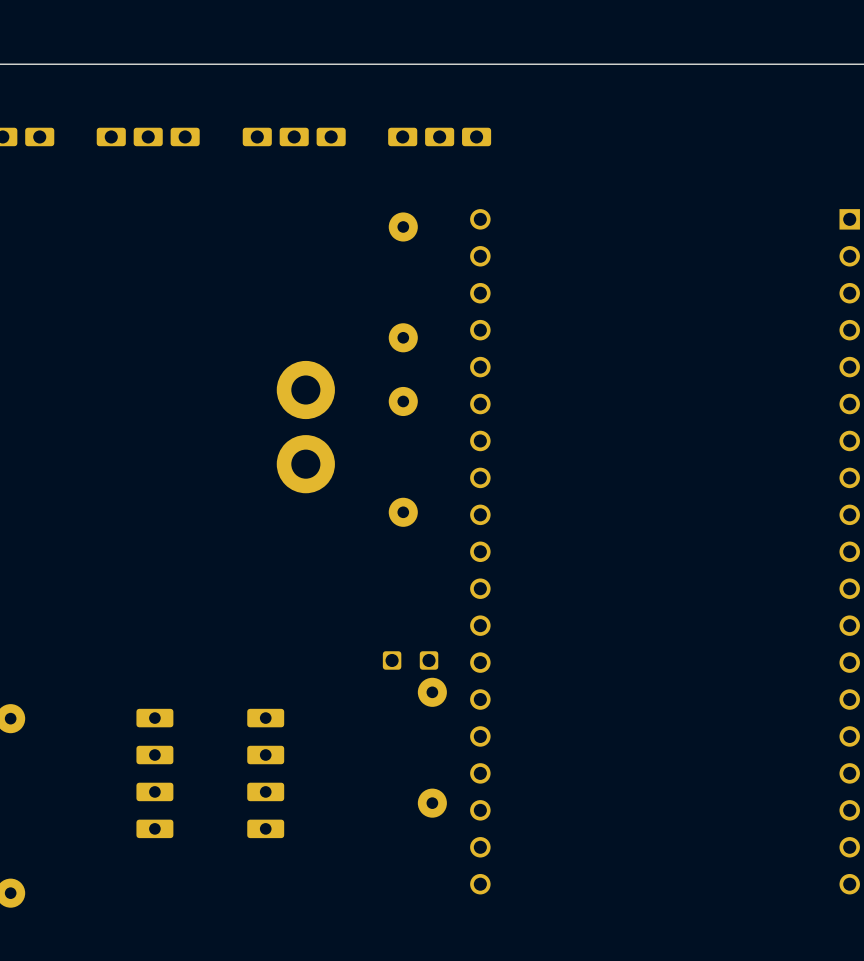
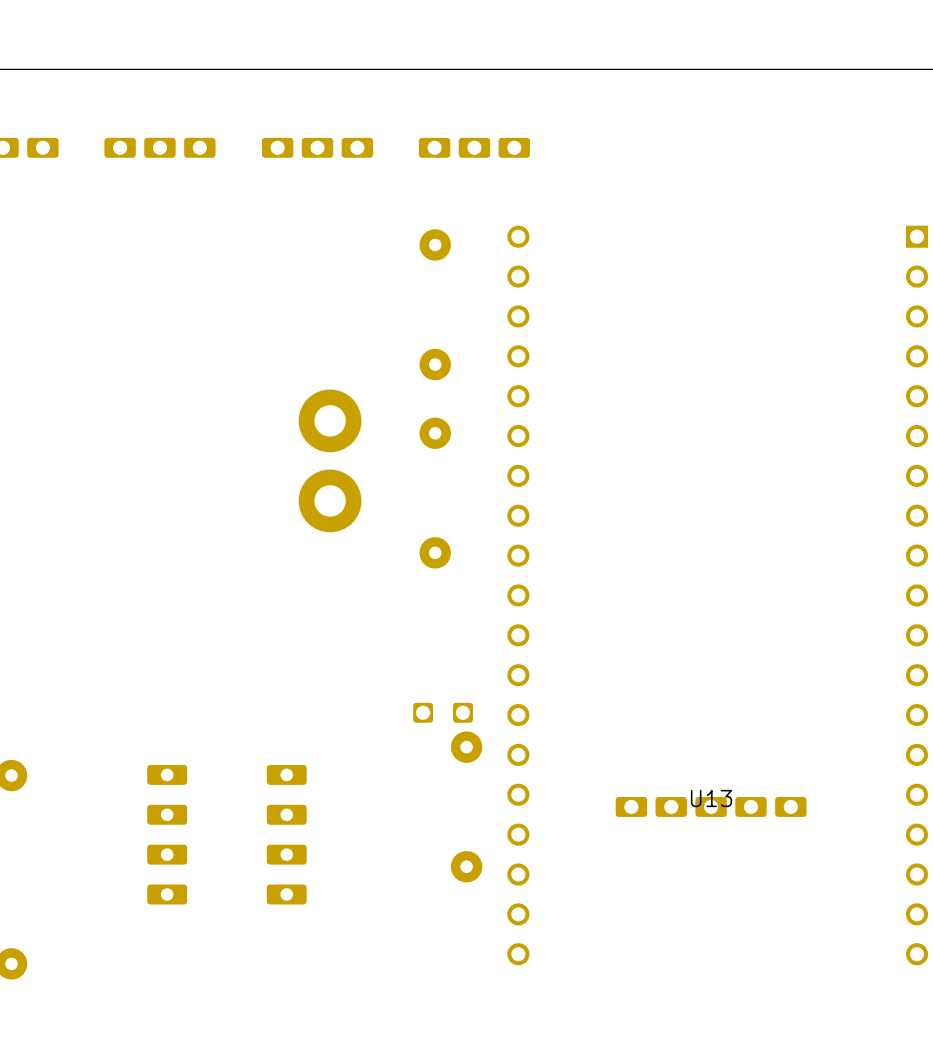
U13: none -> (711, 806)

